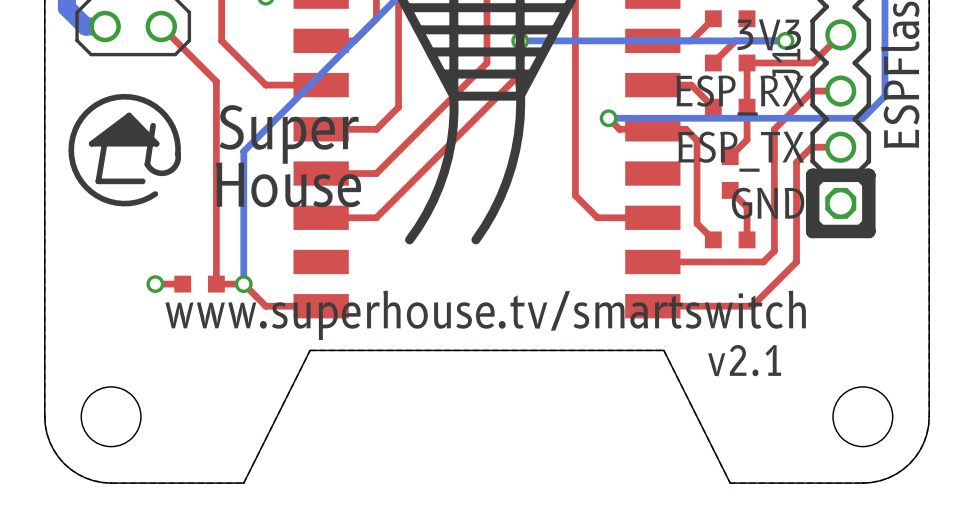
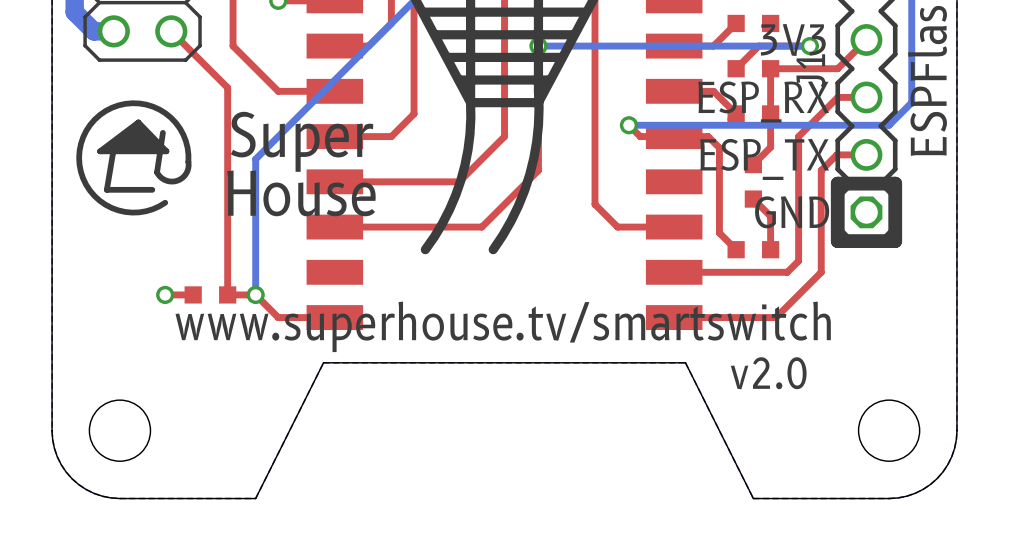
top track: (486, 62) (376, 173) -> (504, 68) (504, 136) (459, 181) (391, 181)
top track: (520, 74) (376, 217) -> (538, 80) (538, 170) (481, 227) (391, 227)
text: v2.1 (744, 360) -> v2.0 (768, 373)

